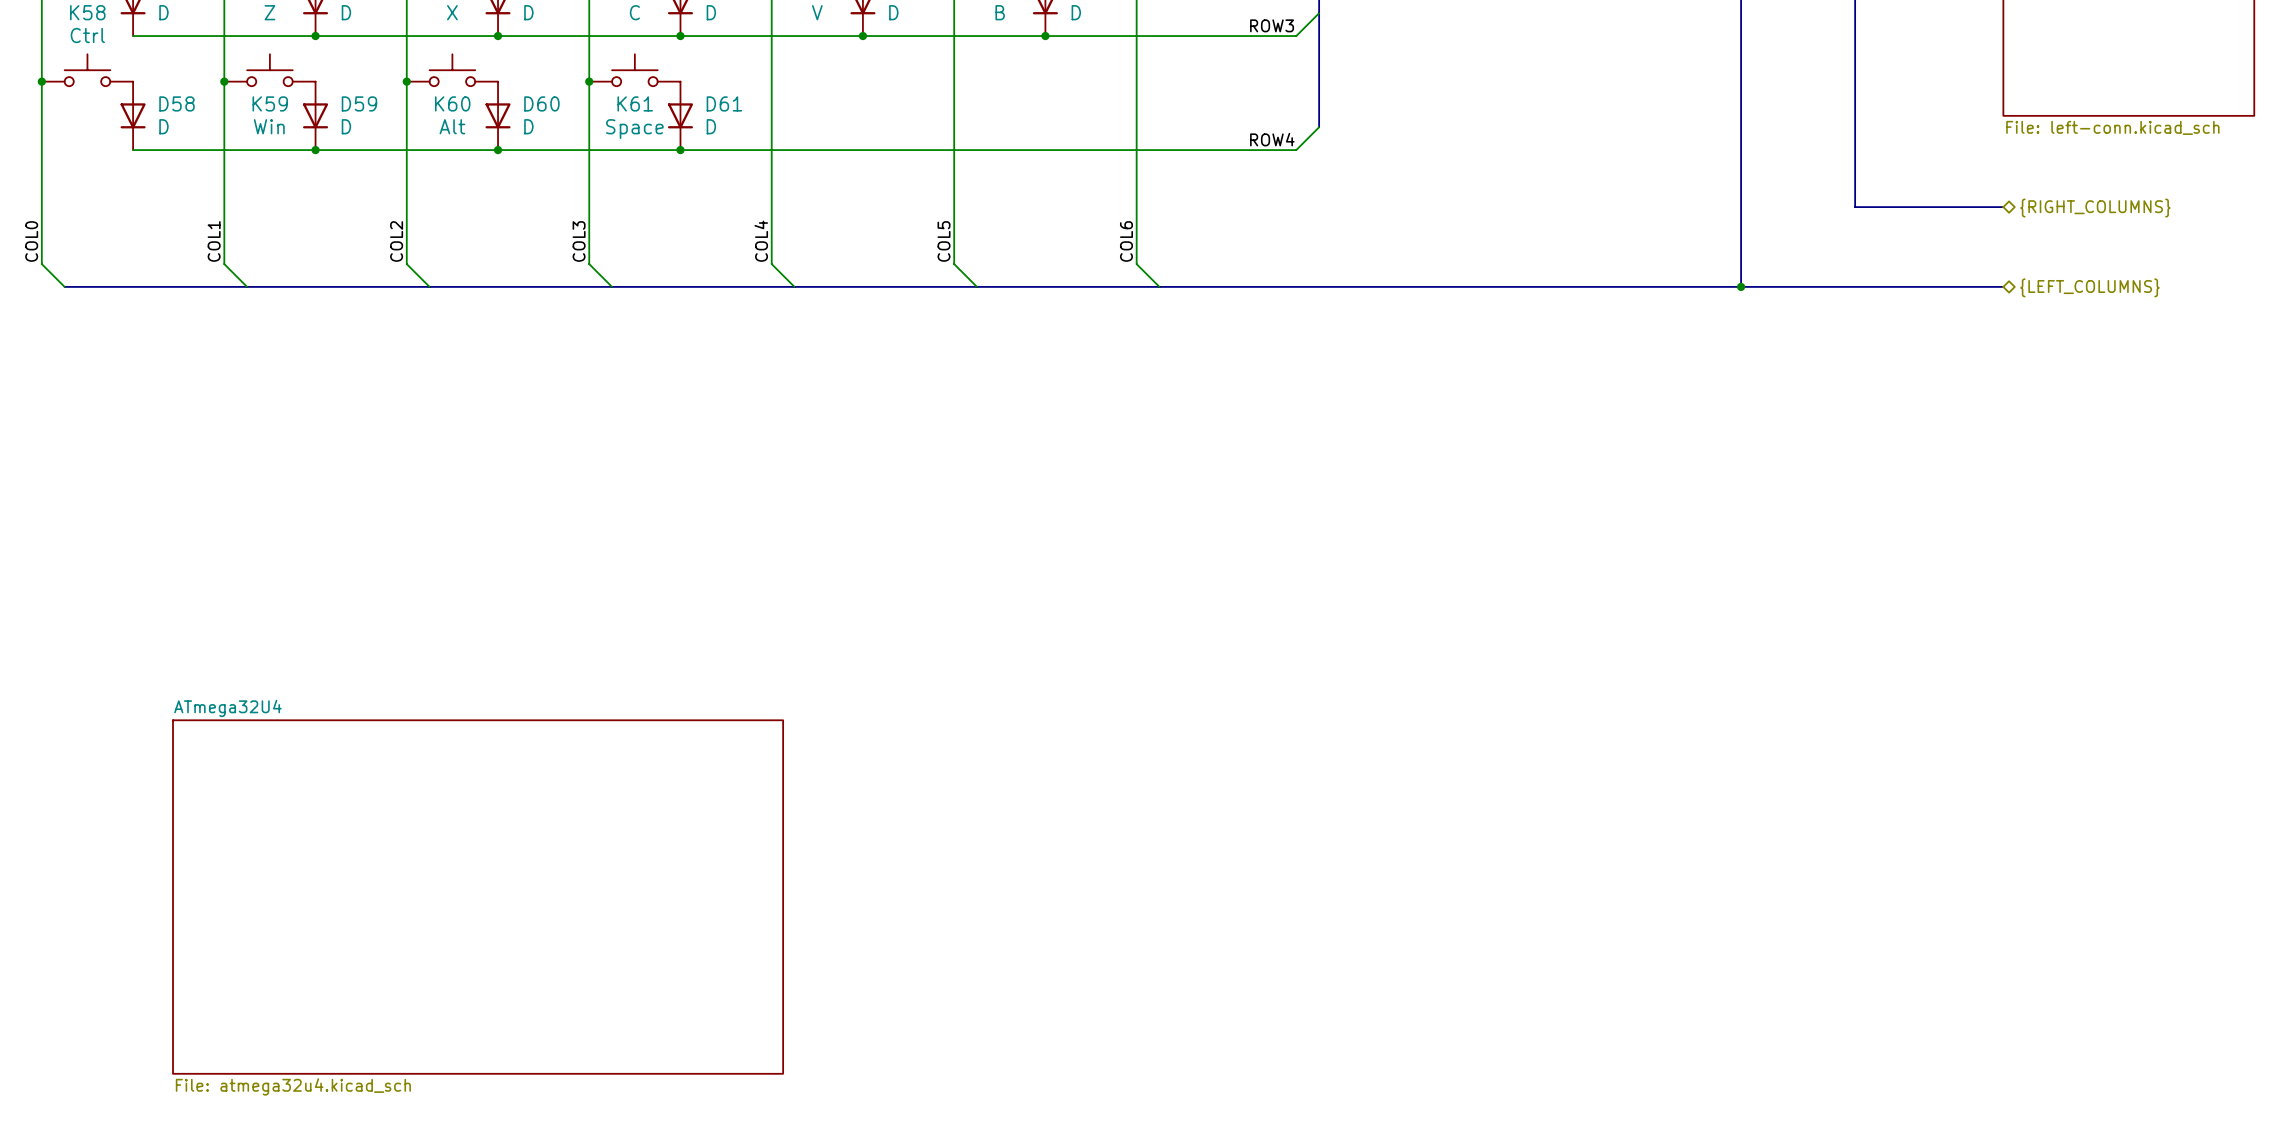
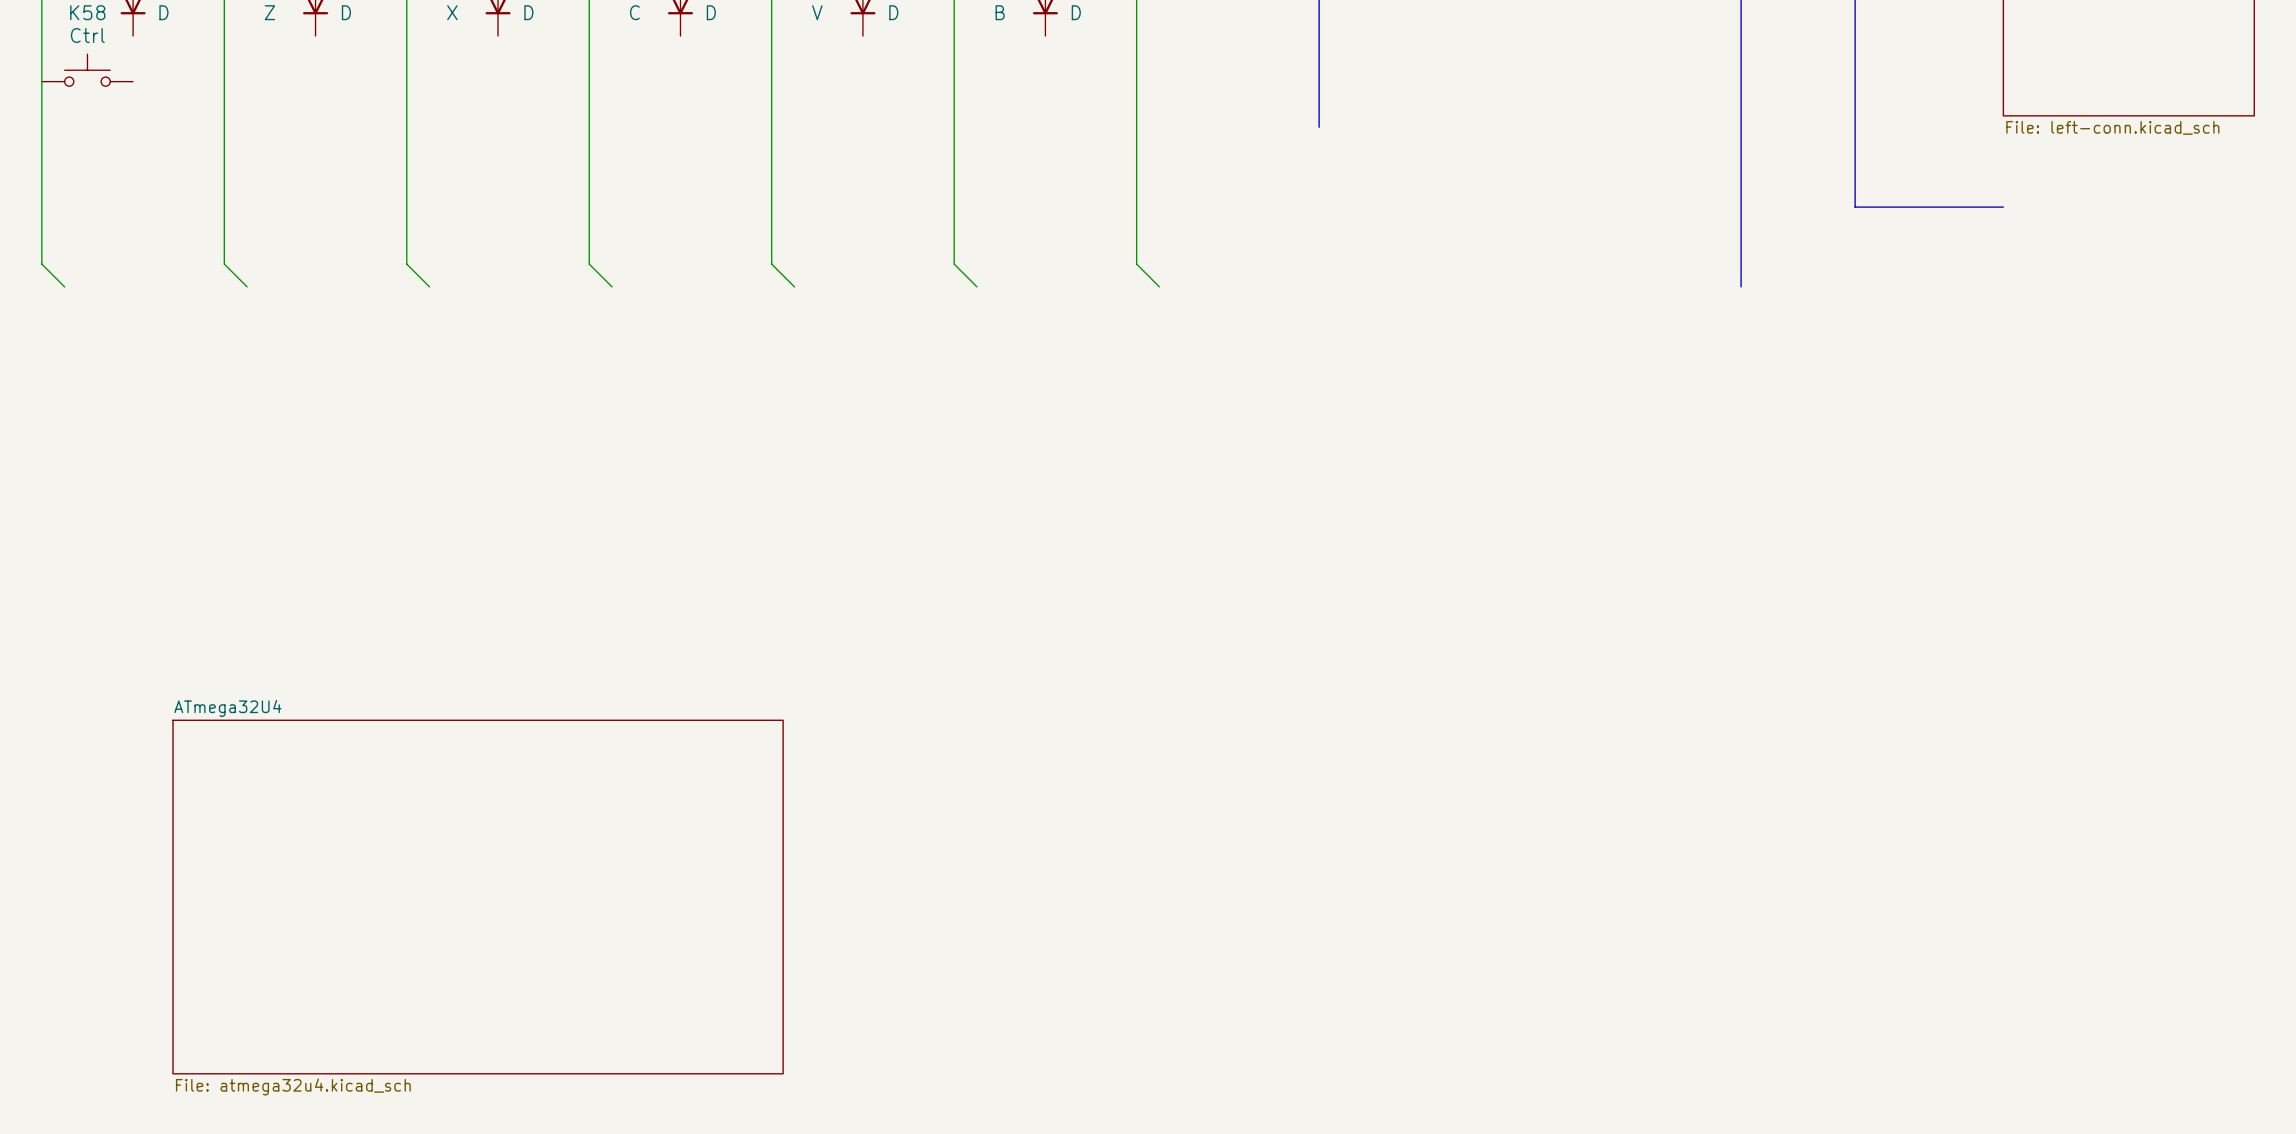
wire: (1319, 13) (1296, 36) (133, 36) -> none
label: ROW3 (1272, 25) -> none
junction: (315, 36) -> none
junction: (498, 36) -> none
junction: (680, 36) -> none
junction: (862, 36) -> none
junction: (1045, 36) -> none
K59: Win (269, 70) -> none
K60: Alt (452, 70) -> none
K61: Space (634, 70) -> none
junction: (41, 81) -> none
junction: (224, 81) -> none
junction: (406, 81) -> none
junction: (589, 81) -> none
D58: D (133, 115) -> none
D59: D (315, 115) -> none
D60: D (498, 115) -> none
D61: D (680, 115) -> none
wire: (1319, 127) (1296, 150) (133, 150) -> none
label: ROW4 (1272, 139) -> none
junction: (315, 150) -> none
junction: (498, 150) -> none
junction: (680, 150) -> none
hierarchical label: {RIGHT_COLUMNS} (2095, 208) -> none
label: COL0 (31, 241) -> none
label: COL1 (214, 241) -> none
label: COL2 (396, 241) -> none
label: COL3 (579, 241) -> none
label: COL4 (761, 241) -> none
label: COL5 (944, 241) -> none
label: COL6 (1126, 241) -> none
bus: (64, 286) (2003, 286) -> none
junction: (1741, 286) -> none
hierarchical label: {LEFT_COLUMNS} (2089, 287) -> none

